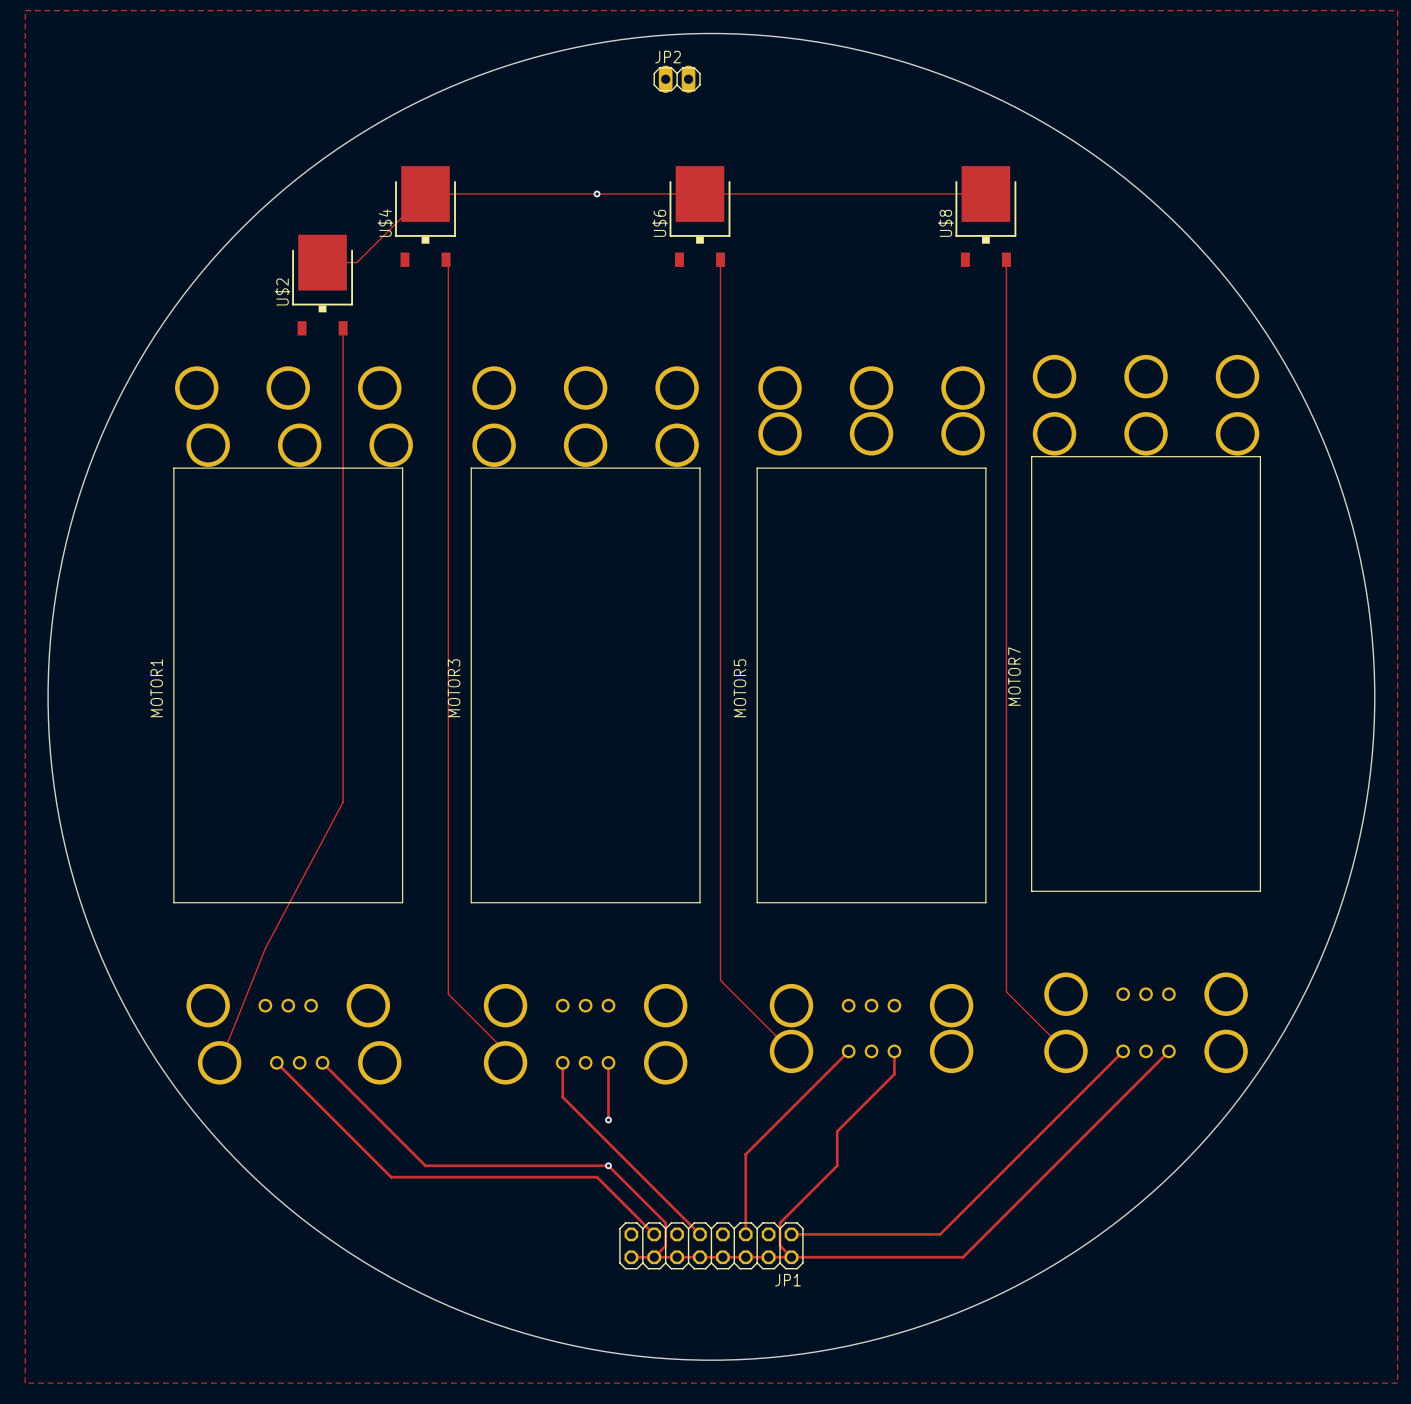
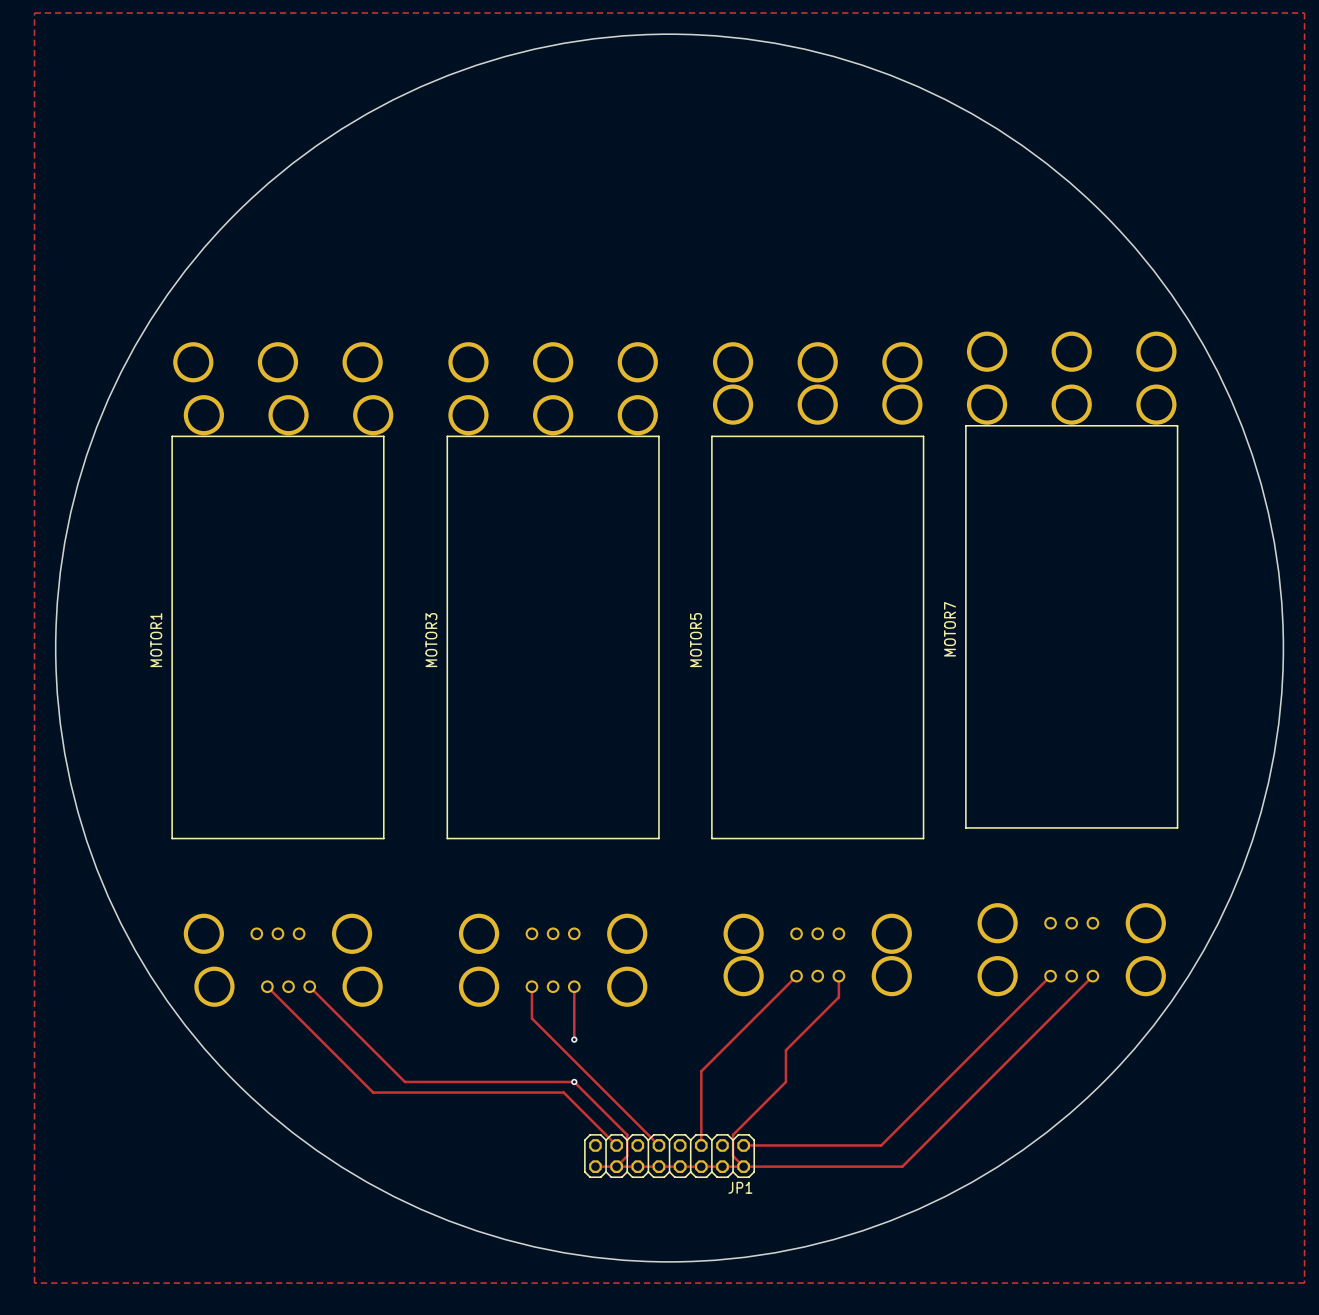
JP2: (677, 79) -> none
via: (597, 193) -> none
track: (985, 193) (425, 193) (356, 262) (322, 262) -> none
U$4: (425, 216) -> none
U$6: (699, 216) -> none
U$8: (985, 216) -> none
track: (446, 259) (448, 262) (448, 994) (505, 1051) (505, 1062) -> none
track: (720, 259) (720, 980) (791, 1051) -> none
track: (1006, 259) (1006, 991) (1065, 1051) -> none
U$2: (322, 285) -> none
track: (343, 328) (343, 802) (265, 948) (219, 1062) -> none

